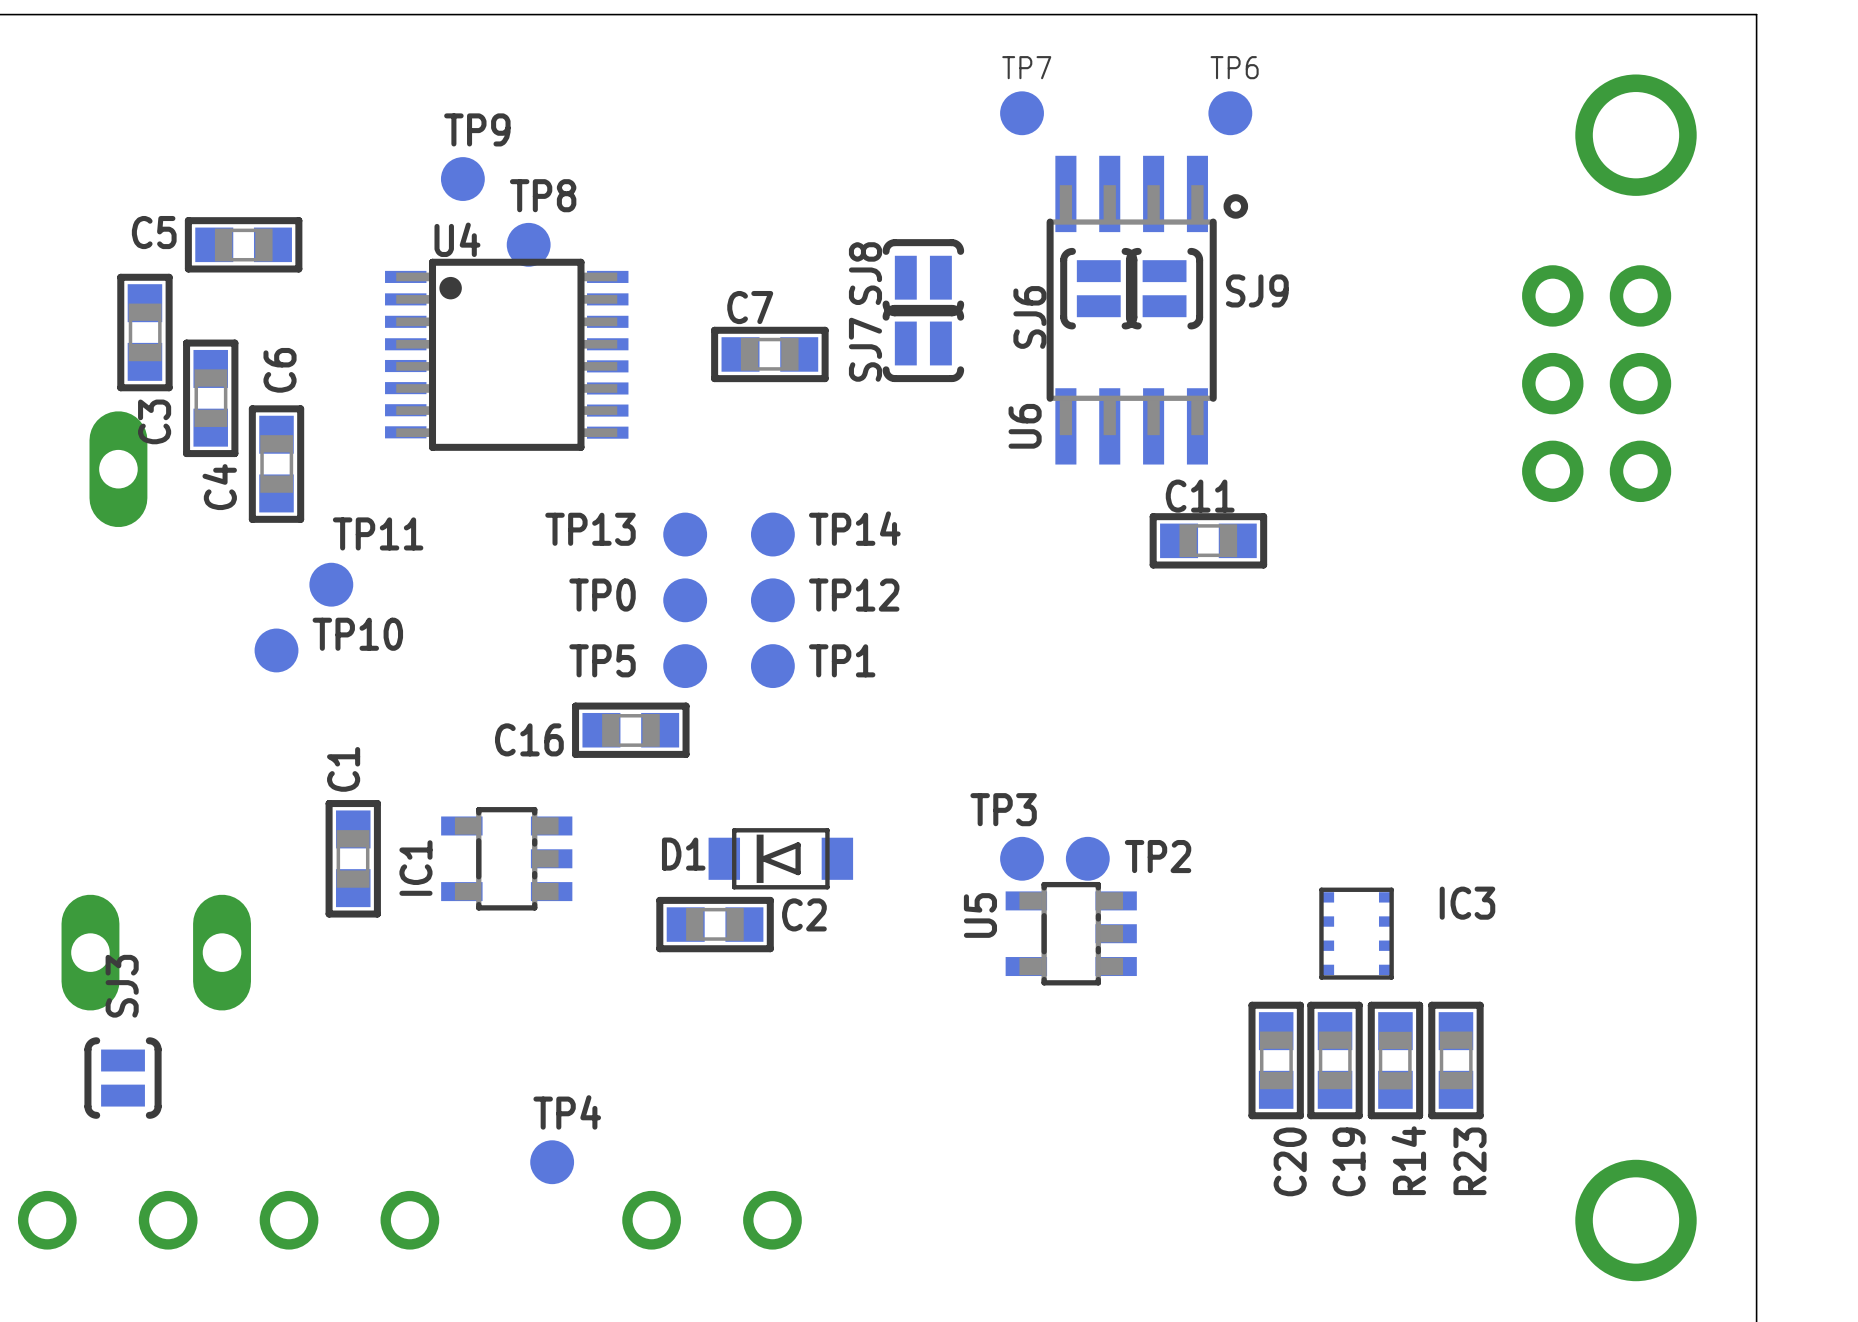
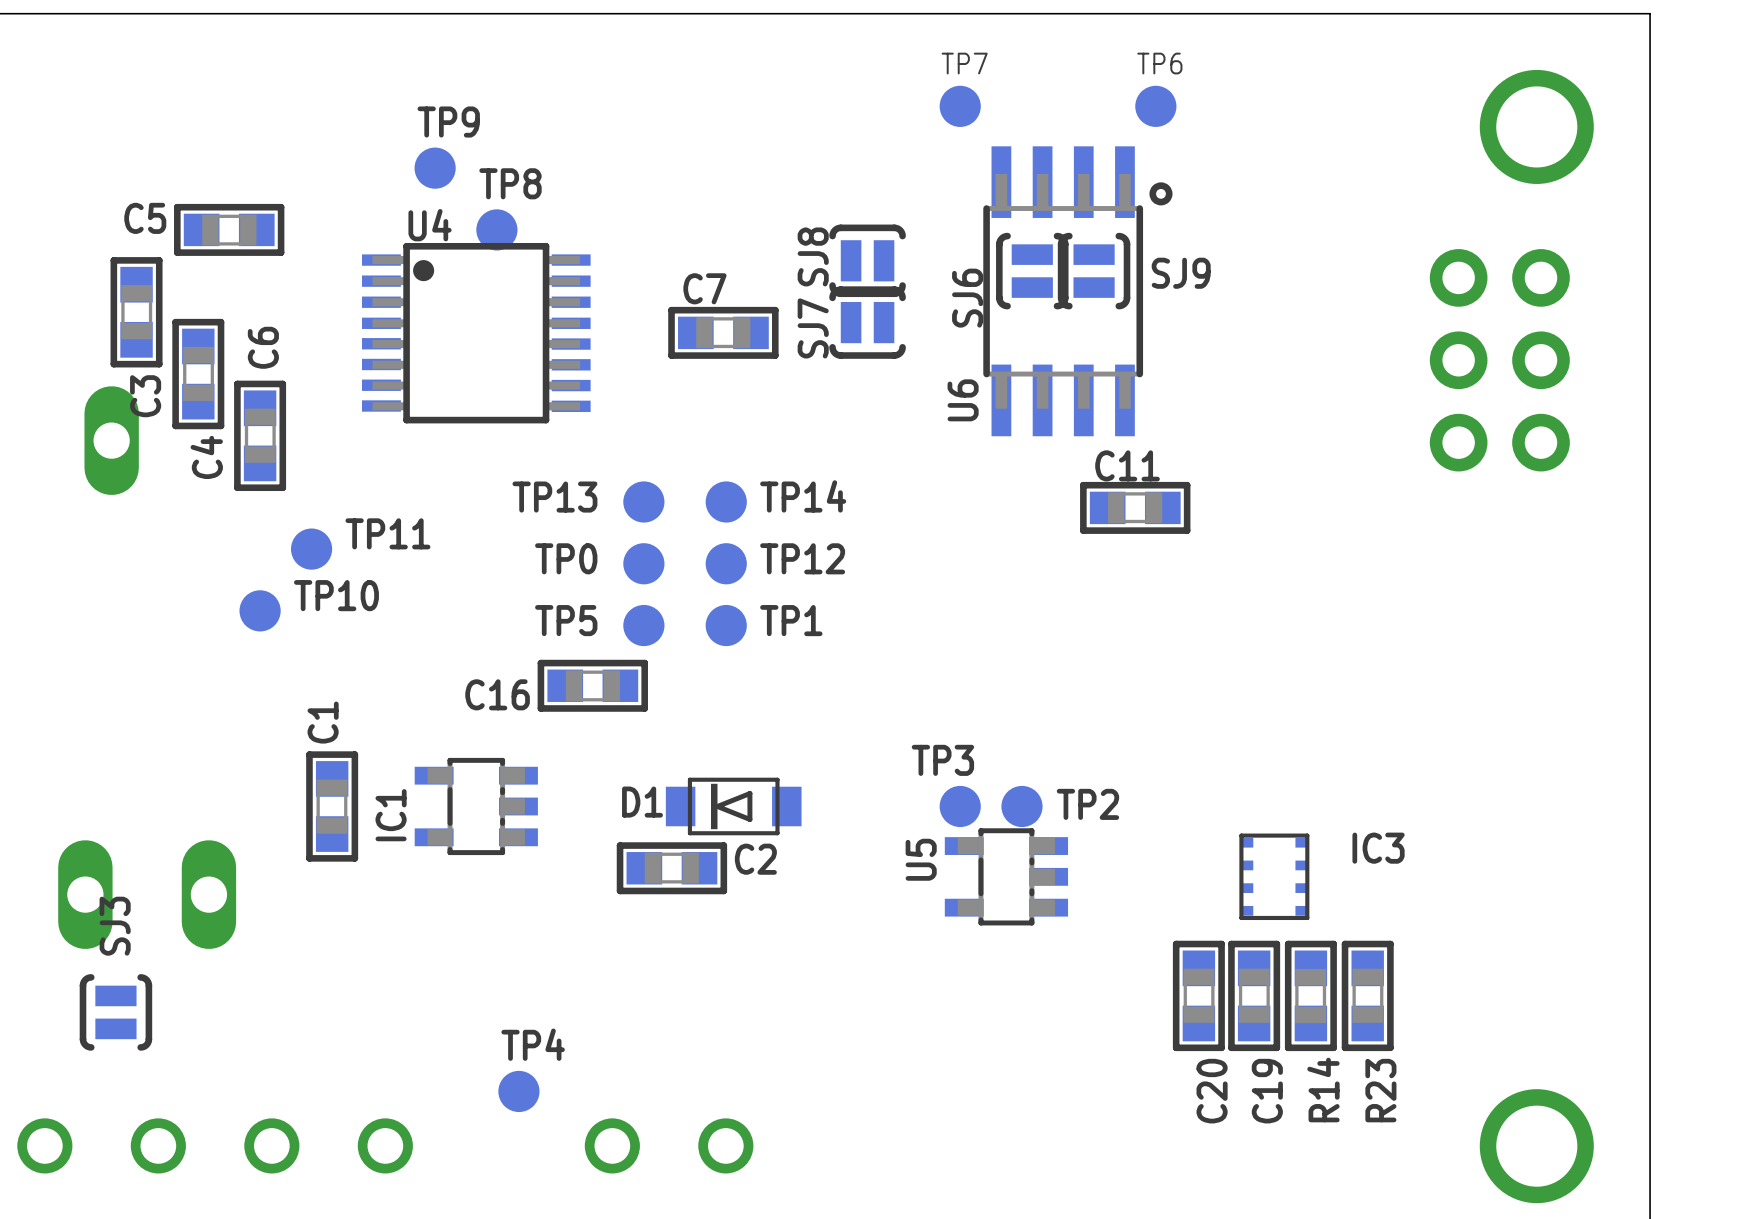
TP11 name position: TP11 (378, 533) -> TP11 (387, 533)

